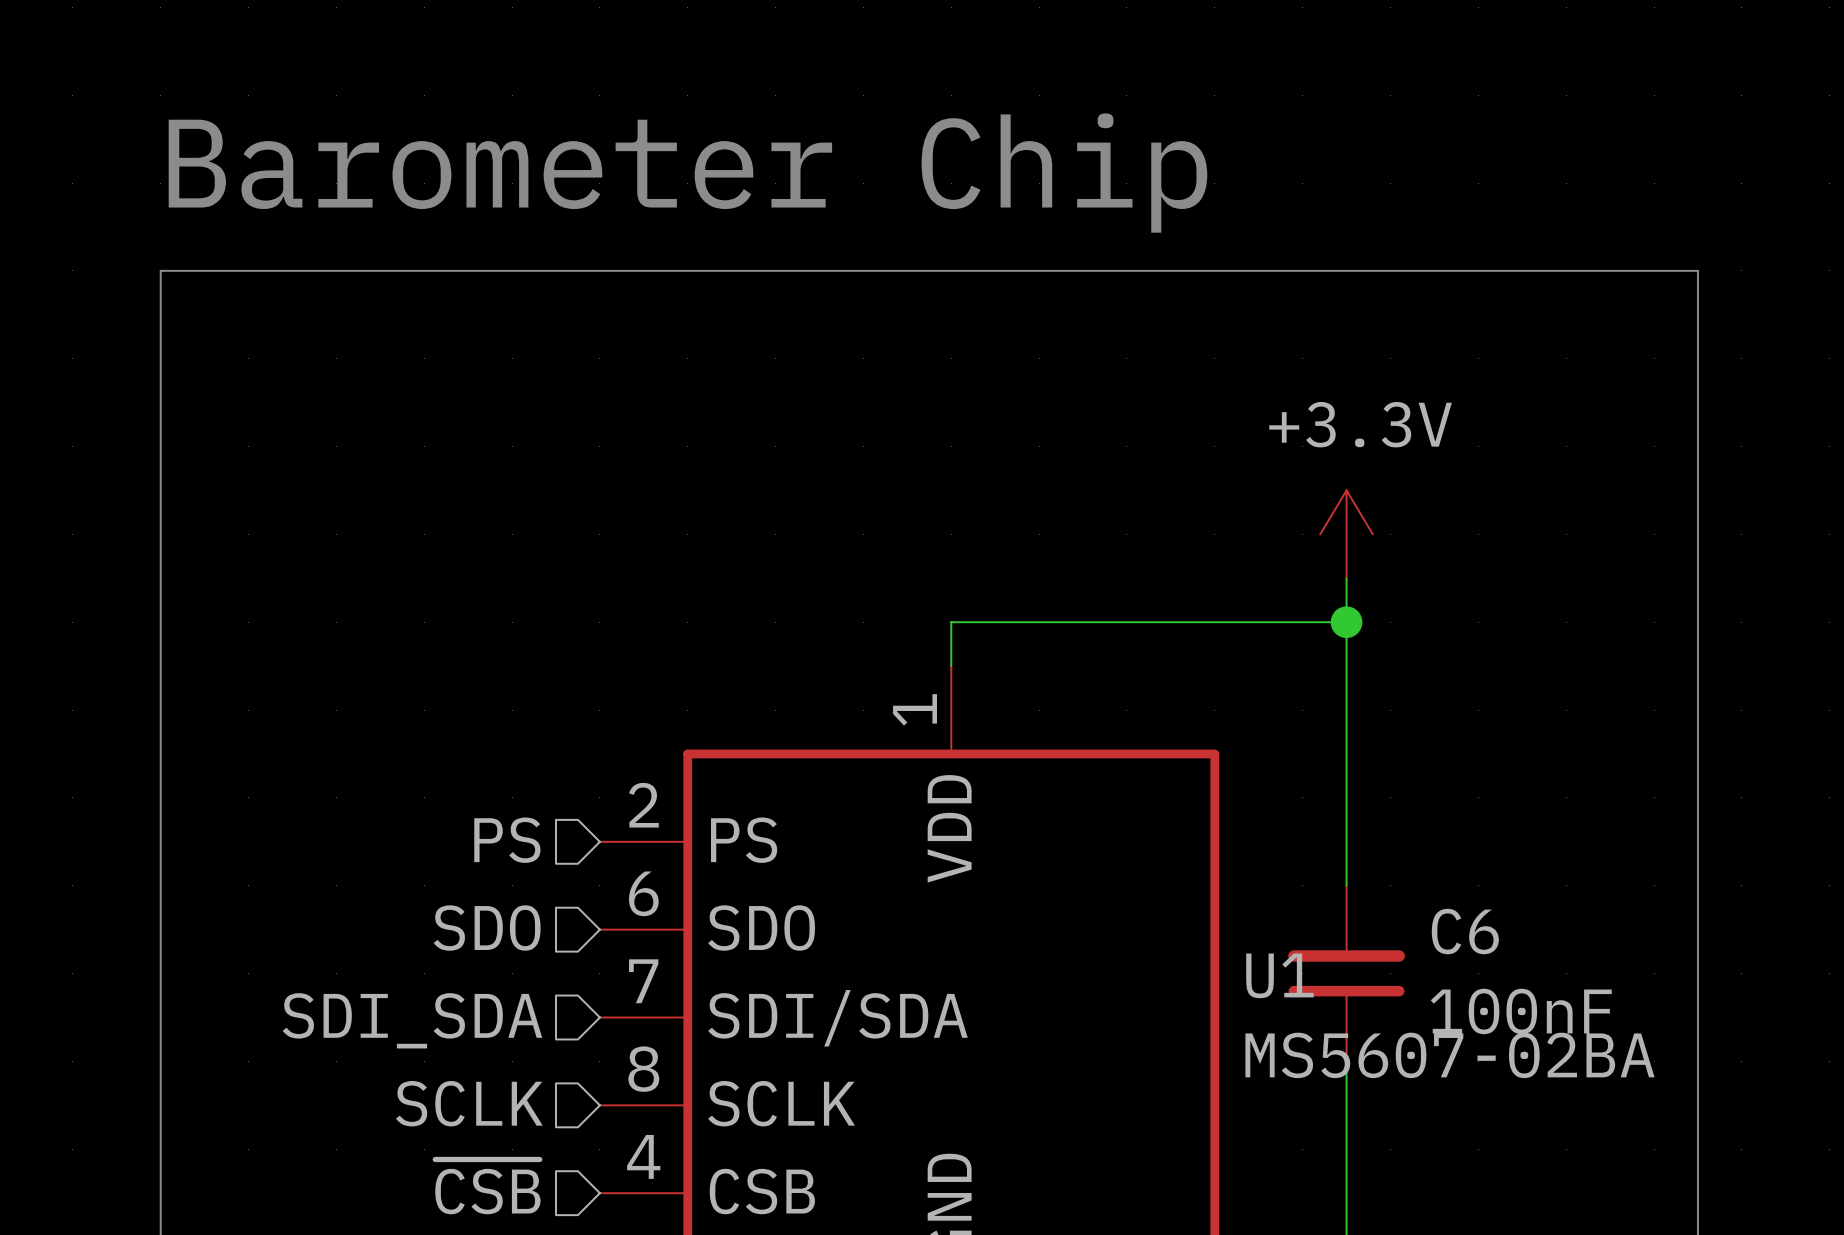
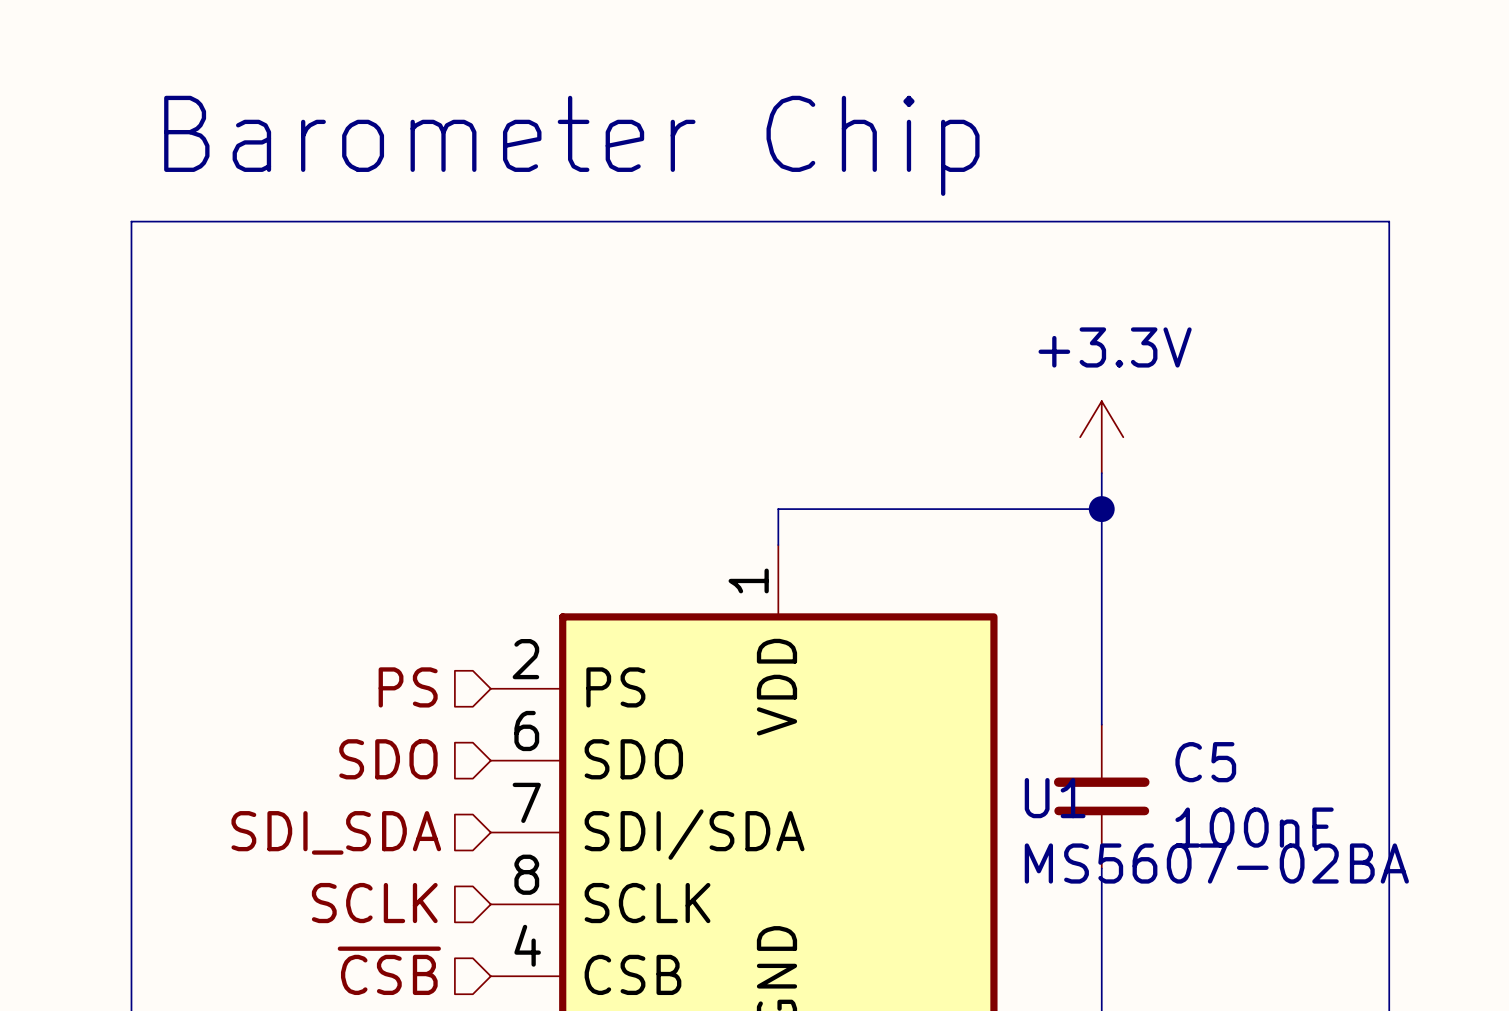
C6 name: C6 (1465, 931) -> C5 (1205, 762)

